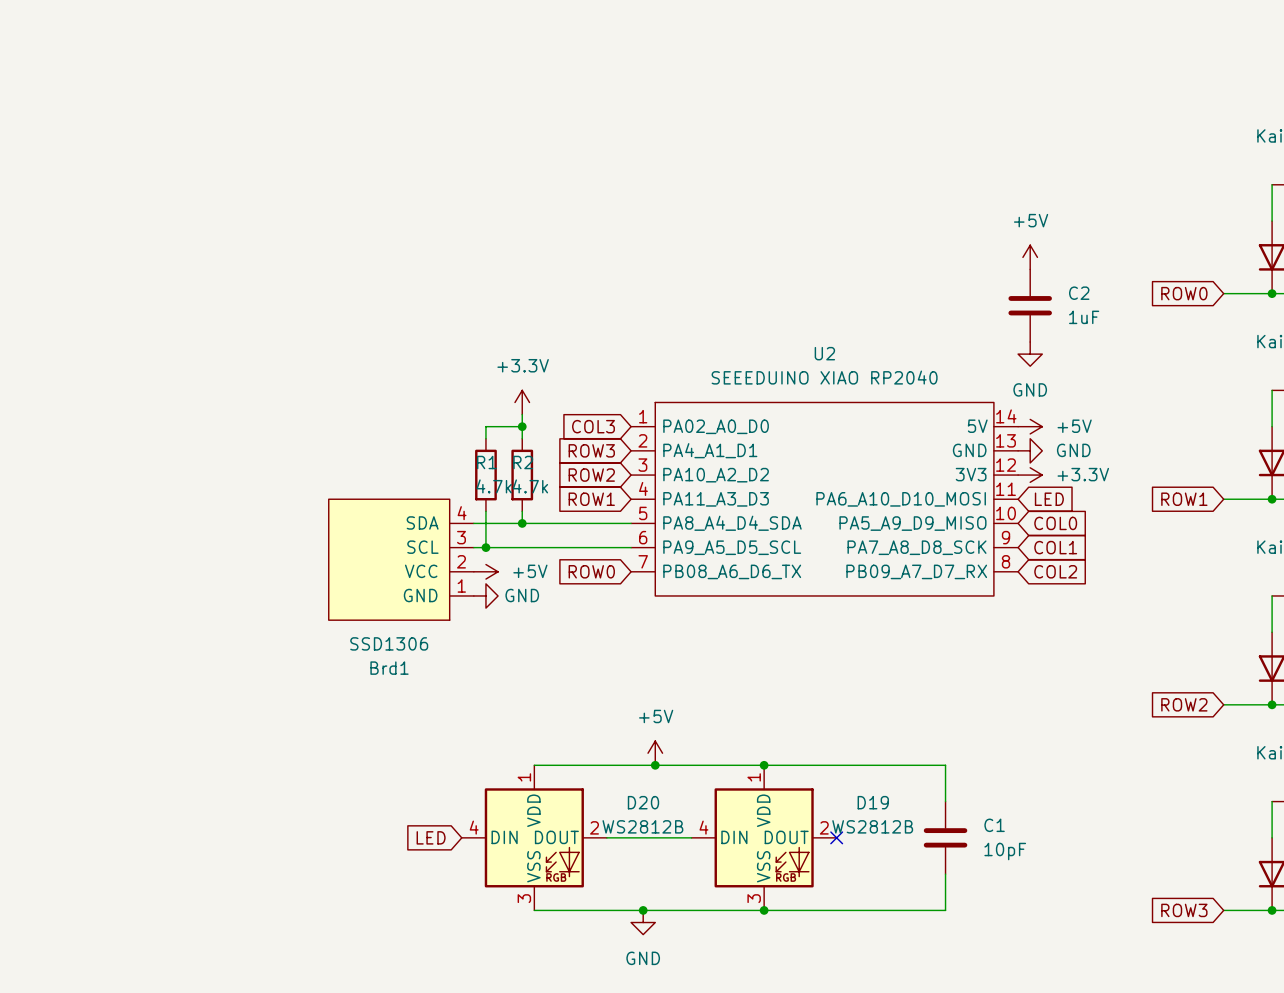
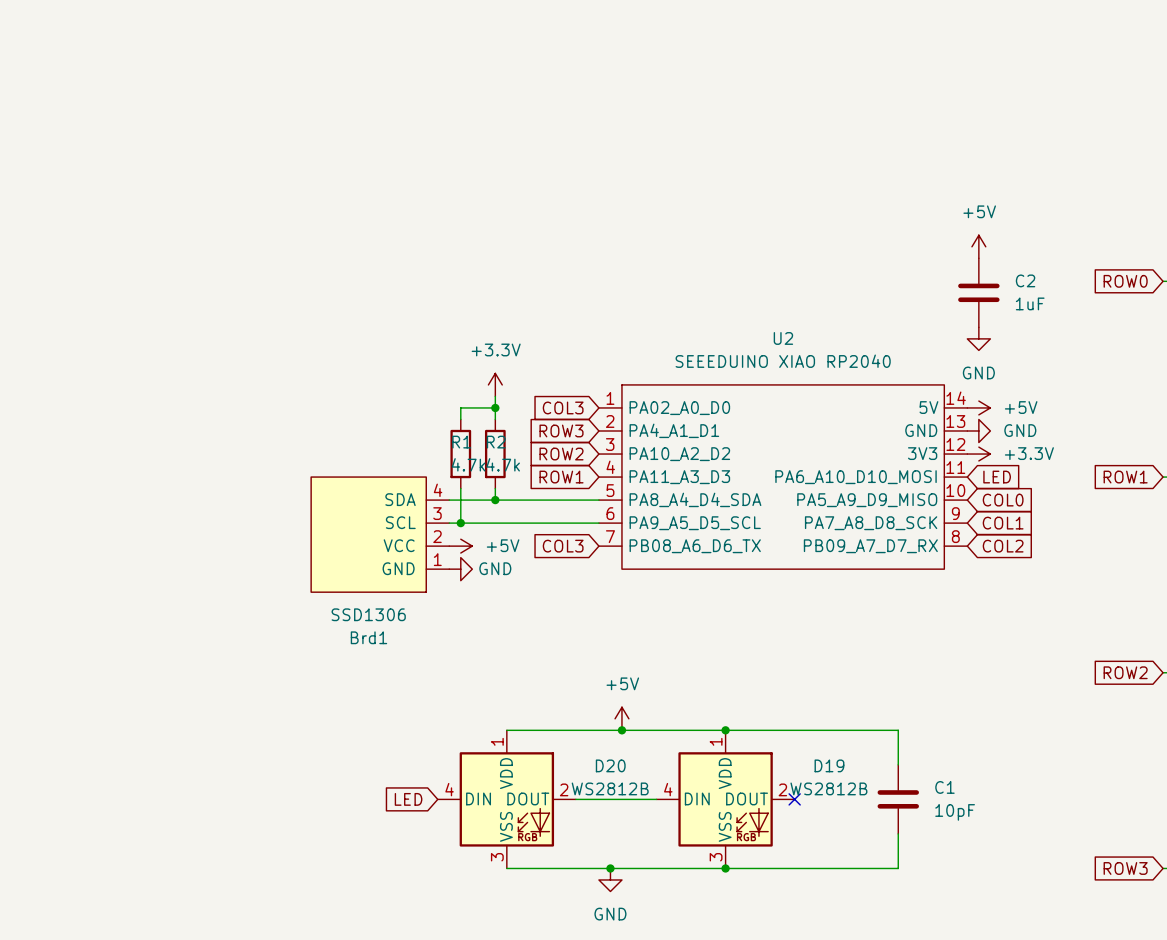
global label: ROW0 (591, 571) -> COL3 (563, 546)

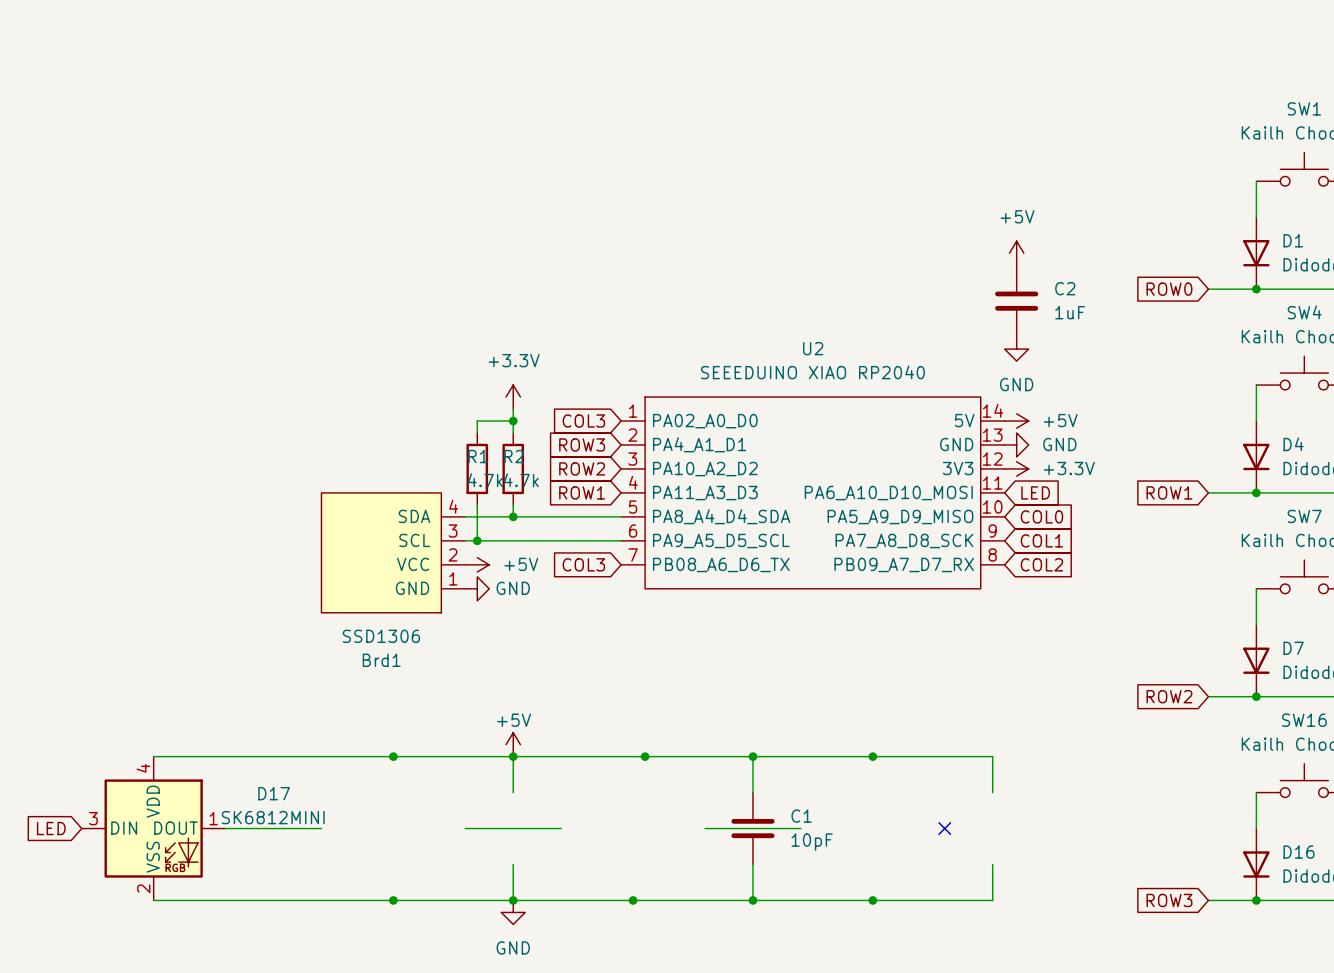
power symbol text position: +5V (622, 683) -> +5V (514, 720)
power symbol position: +5V (621, 718) -> +5V (513, 744)
wire: none -> (153, 756) (525, 756)
junction: none -> (393, 756)
wire: none -> (513, 756) (513, 792)
junction: none -> (513, 756)
junction: none -> (872, 756)
wire: (898, 730) (898, 764) -> (932, 756) (992, 756) (992, 792)
global label: none -> LED (51, 828)
D17: none -> SK6812MINI (153, 828)
wire: none -> (225, 828) (321, 828)
global label: LED (408, 799) -> none
D20: WS2812B (506, 799) -> none
wire: (575, 799) (656, 799) -> none
D19: WS2812B (725, 799) -> none
no-connect mark: (794, 799) -> none
C1 position: (898, 799) -> (752, 828)
no-connect mark: none -> (944, 828)
wire: none -> (513, 864) (513, 900)
wire: (898, 833) (898, 868) -> (992, 864) (992, 900) (932, 900)
wire: none -> (153, 900) (525, 900)
junction: none -> (393, 900)
junction: none -> (513, 900)
junction: none -> (872, 900)
power symbol position: GND (610, 879) -> GND (513, 912)

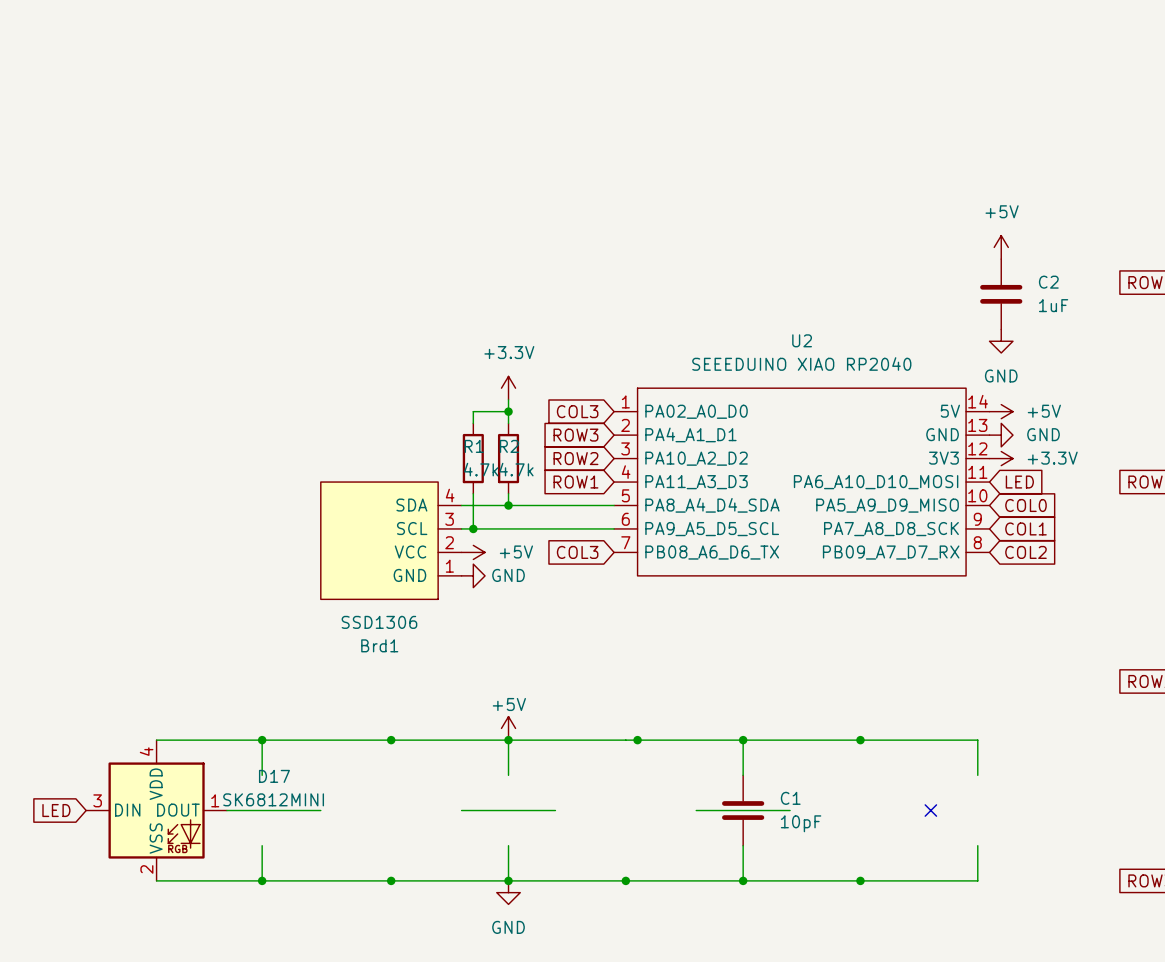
wire: none -> (262, 740) (262, 775)
junction: none -> (262, 740)
wire: none -> (262, 845) (262, 880)
junction: none -> (262, 880)

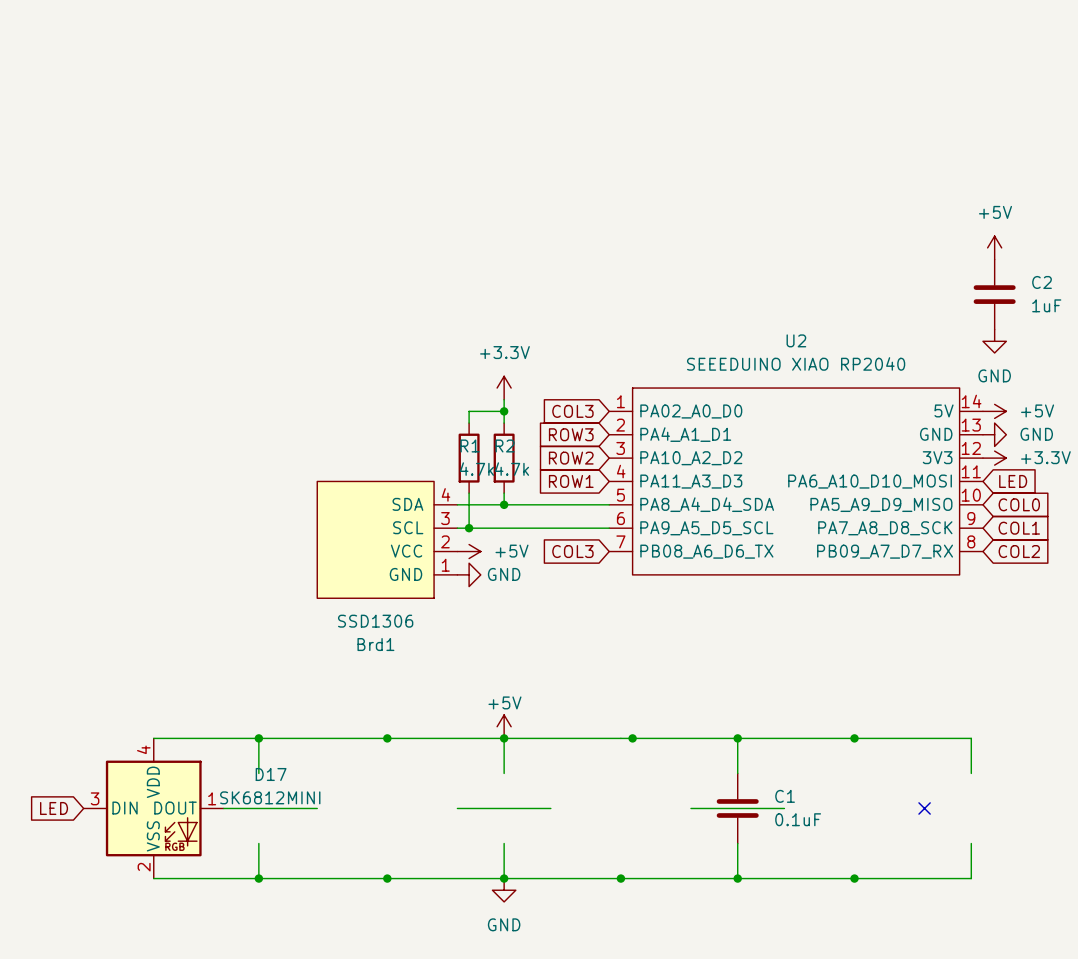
C1 value: 10pF (801, 823) -> 0.1uF (798, 819)

